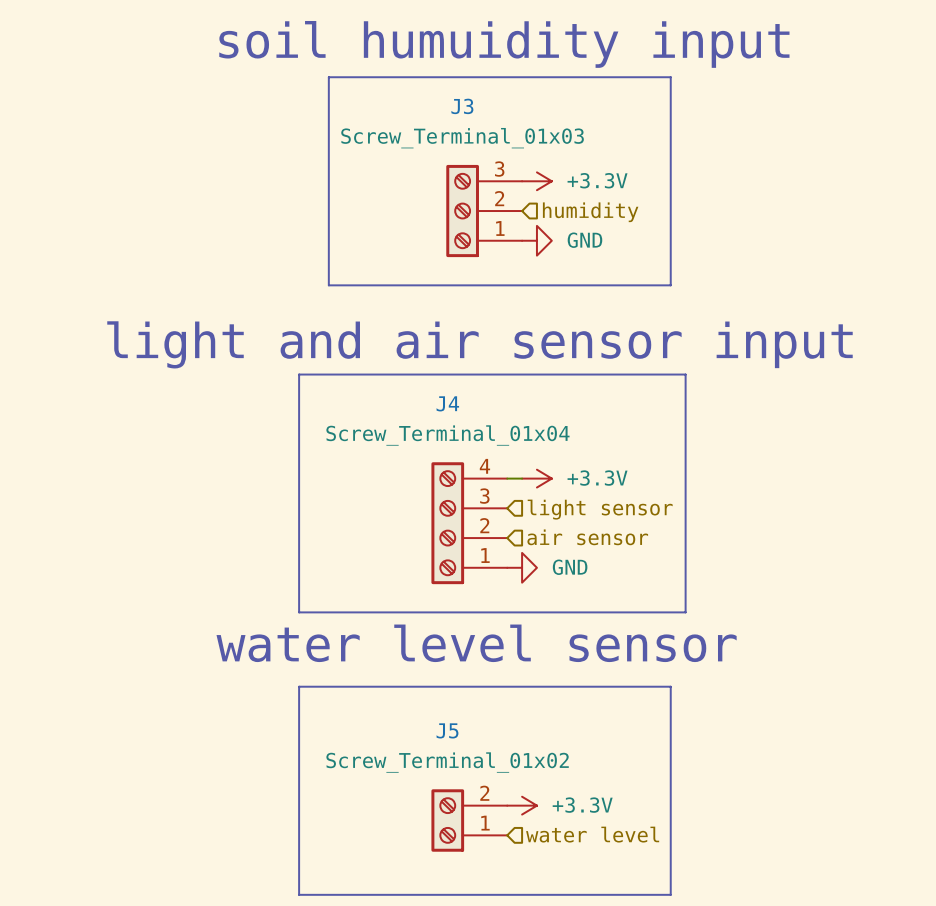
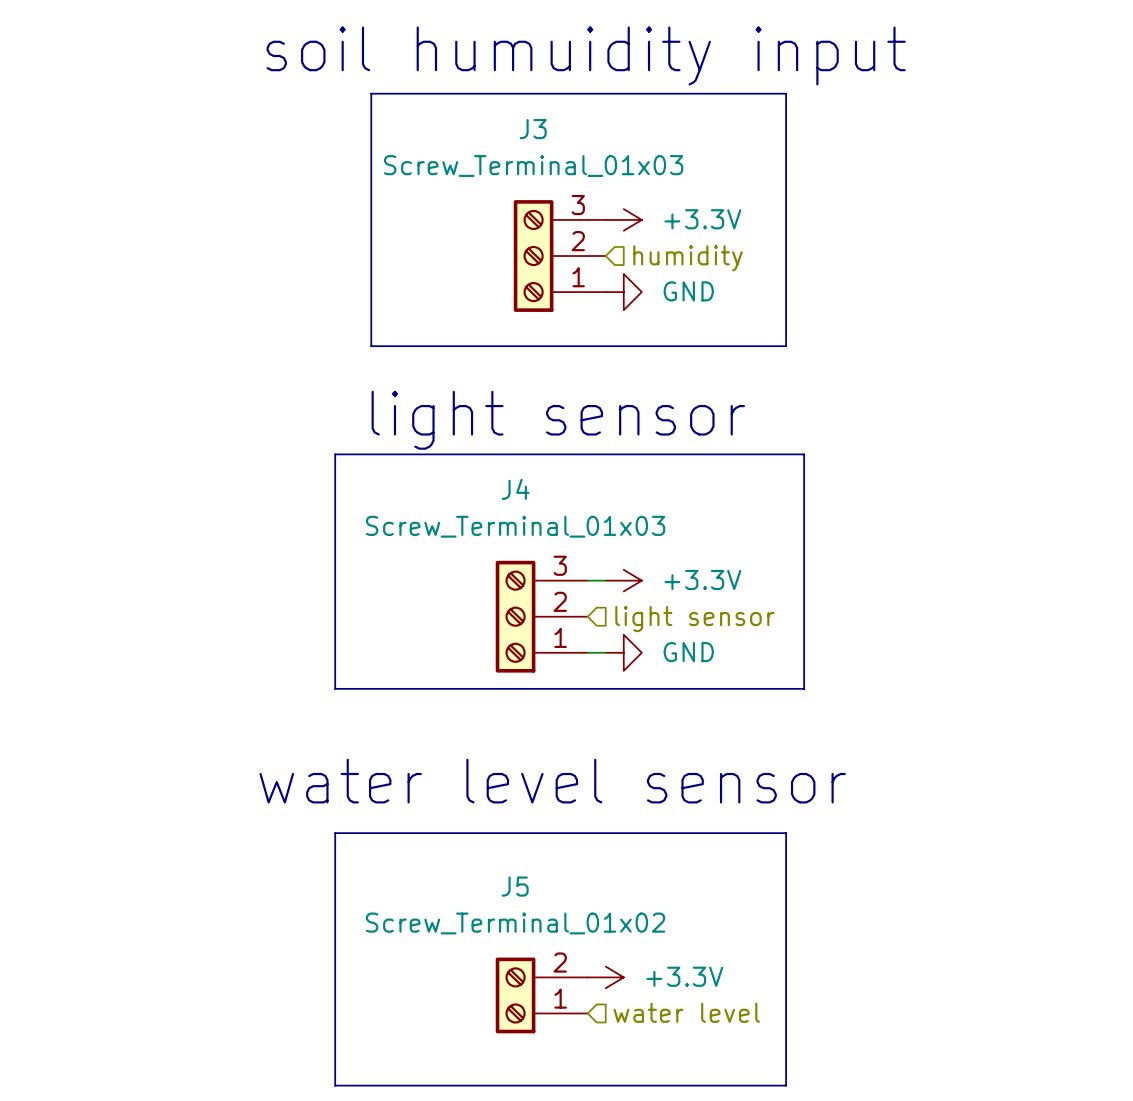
text: light and air sensor input (479, 344) -> light sensor (558, 420)
J4 value: Screw_Terminal_01x04 (447, 435) -> Screw_Terminal_01x03 (515, 526)
J4 symbol: [431, 462, 508, 585] -> [495, 560, 588, 673]
hierarchical label: air sensor (587, 537) -> none
wire: none -> (587, 652) (605, 652)
line: (299, 567) (299, 612) (685, 612) (685, 567) -> (335, 688) (804, 688)
power symbol position: GND (522, 567) -> GND (623, 652)

